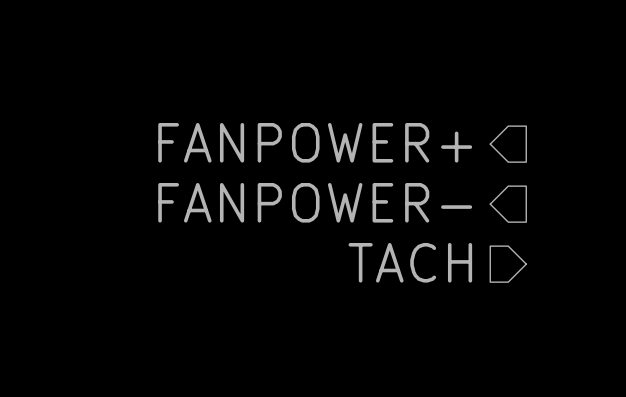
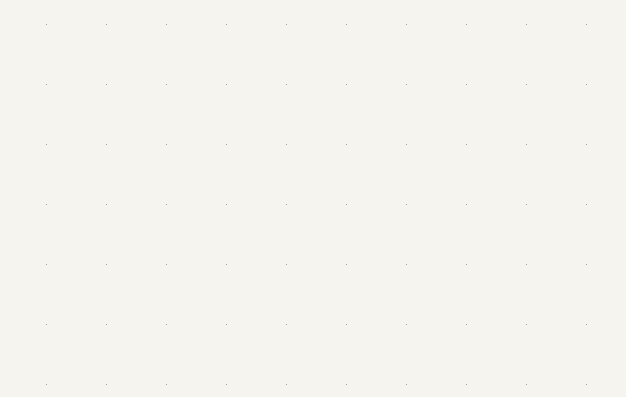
hierarchical label: FANPOWER+ (315, 142) -> none
hierarchical label: FANPOWER- (315, 202) -> none
hierarchical label: TACH (410, 262) -> none

